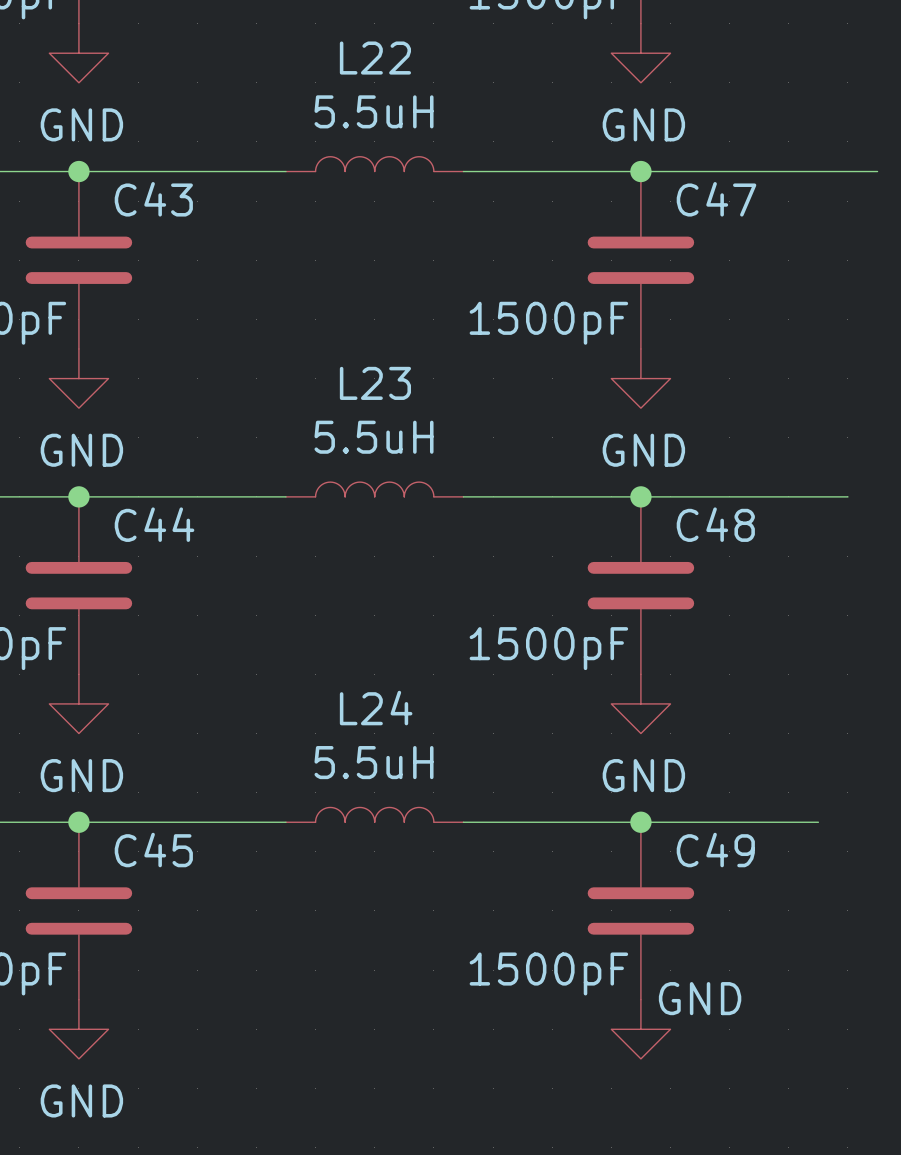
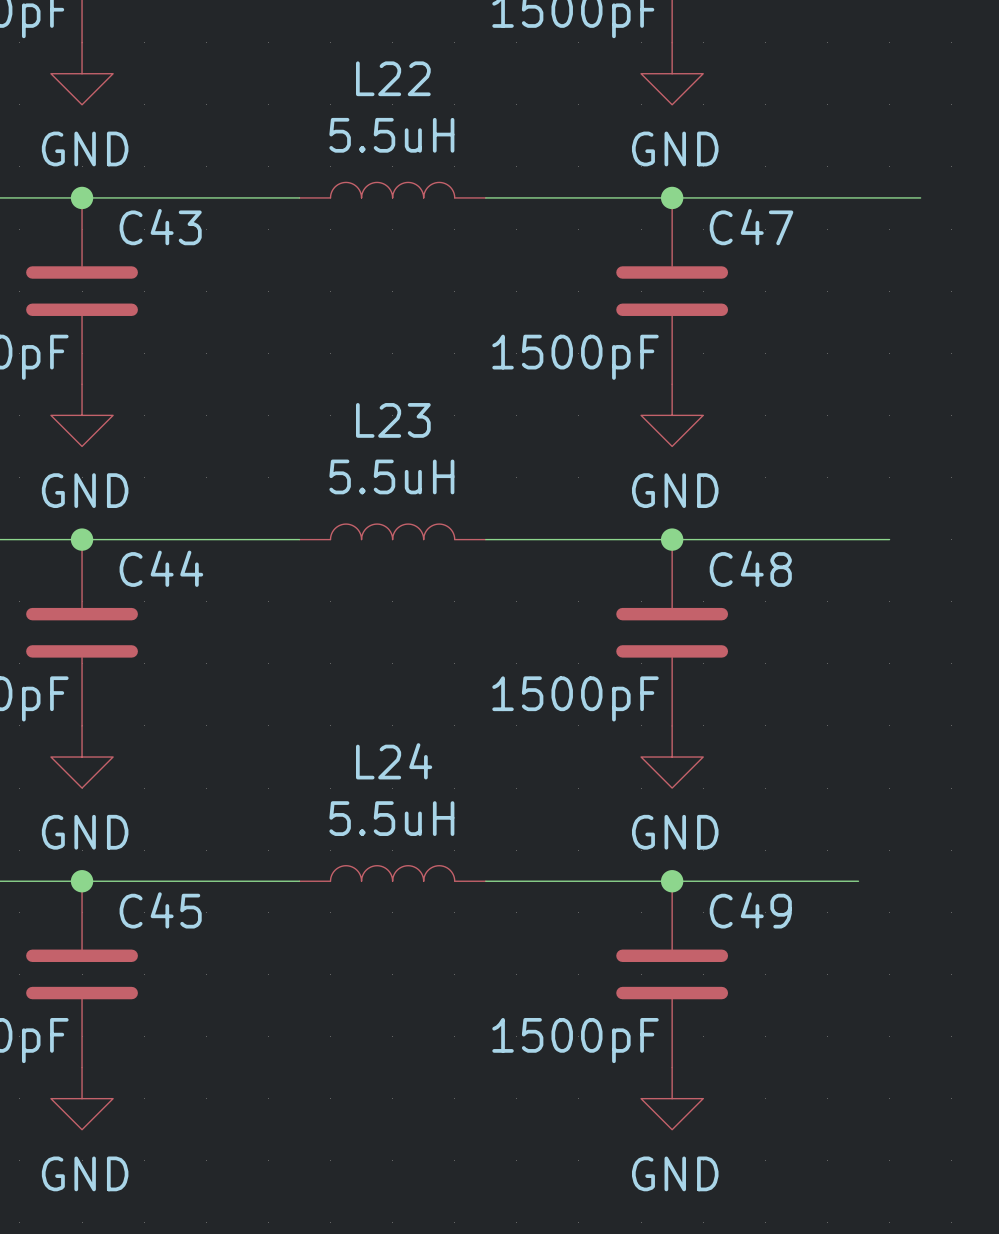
power symbol text position: GND (700, 998) -> GND (675, 1173)

